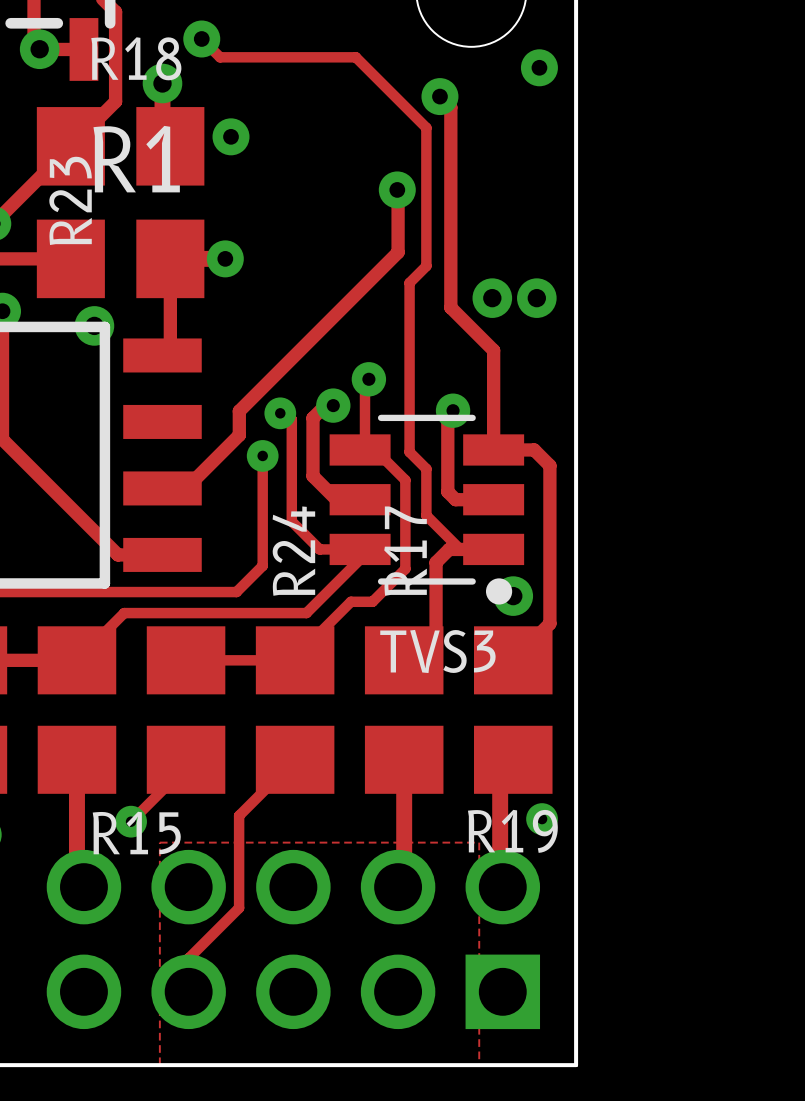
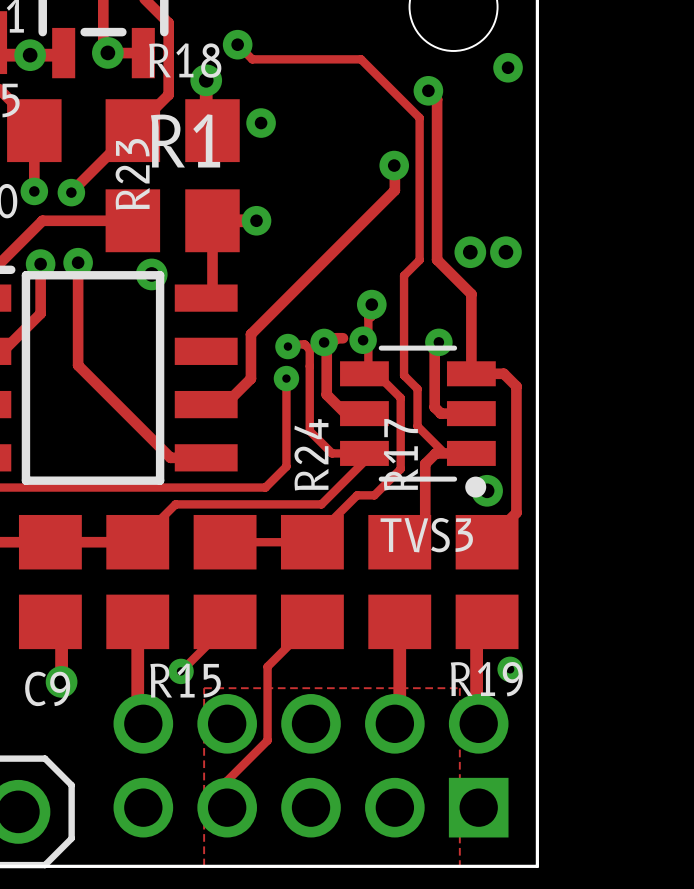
track: (426, 127) (426, 266) (409, 282) (409, 327) -> (417, 115) (419, 117) (419, 260) (404, 275)
track: (398, 220) (398, 252) (239, 411) (239, 435) (218, 456) -> (394, 190) (250, 334) (250, 378)
via: none -> (371, 304)
via: (368, 379) -> none
via: (333, 405) -> none
via: none -> (363, 340)
via: none -> (324, 342)
via position: (280, 413) -> (287, 346)

